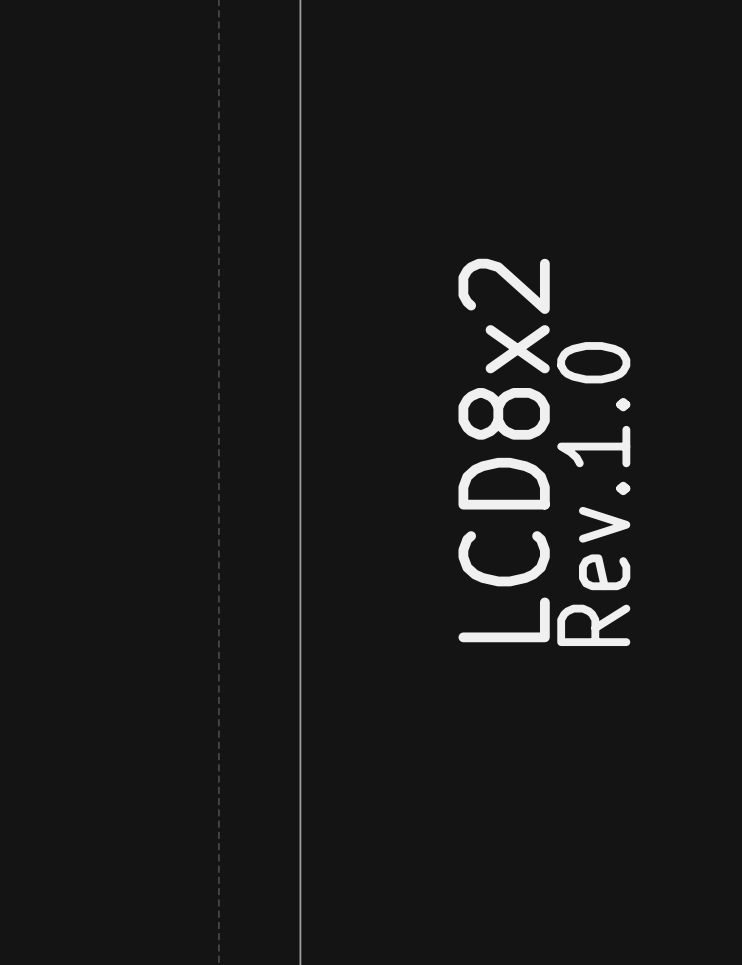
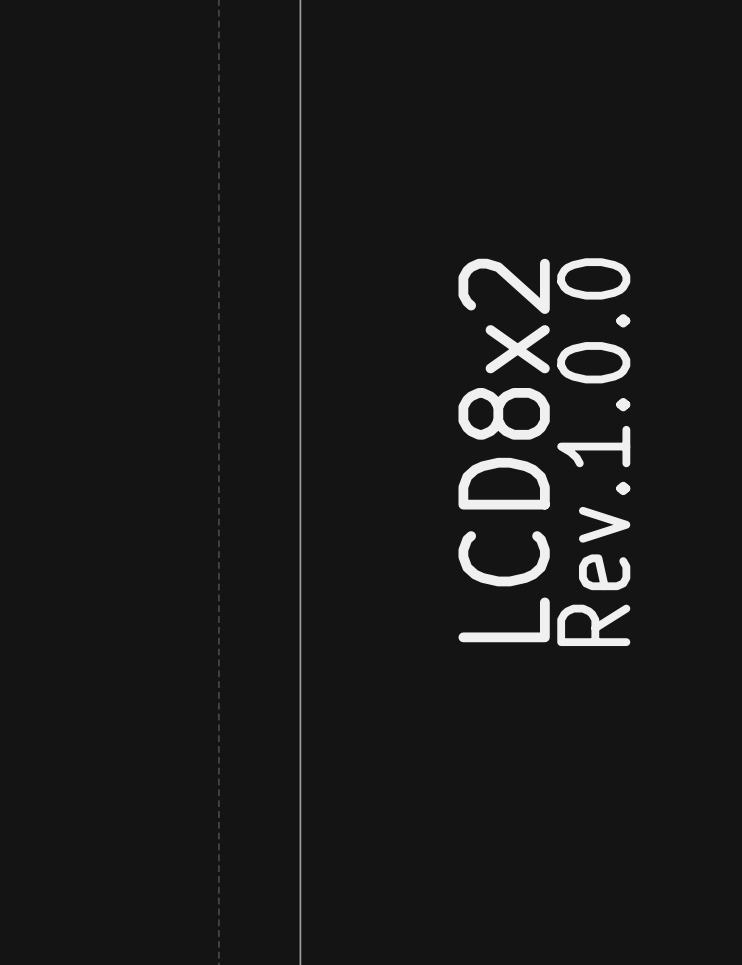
text: Rev.1.0 (593, 494) -> Rev.1.0.0 (593, 452)

